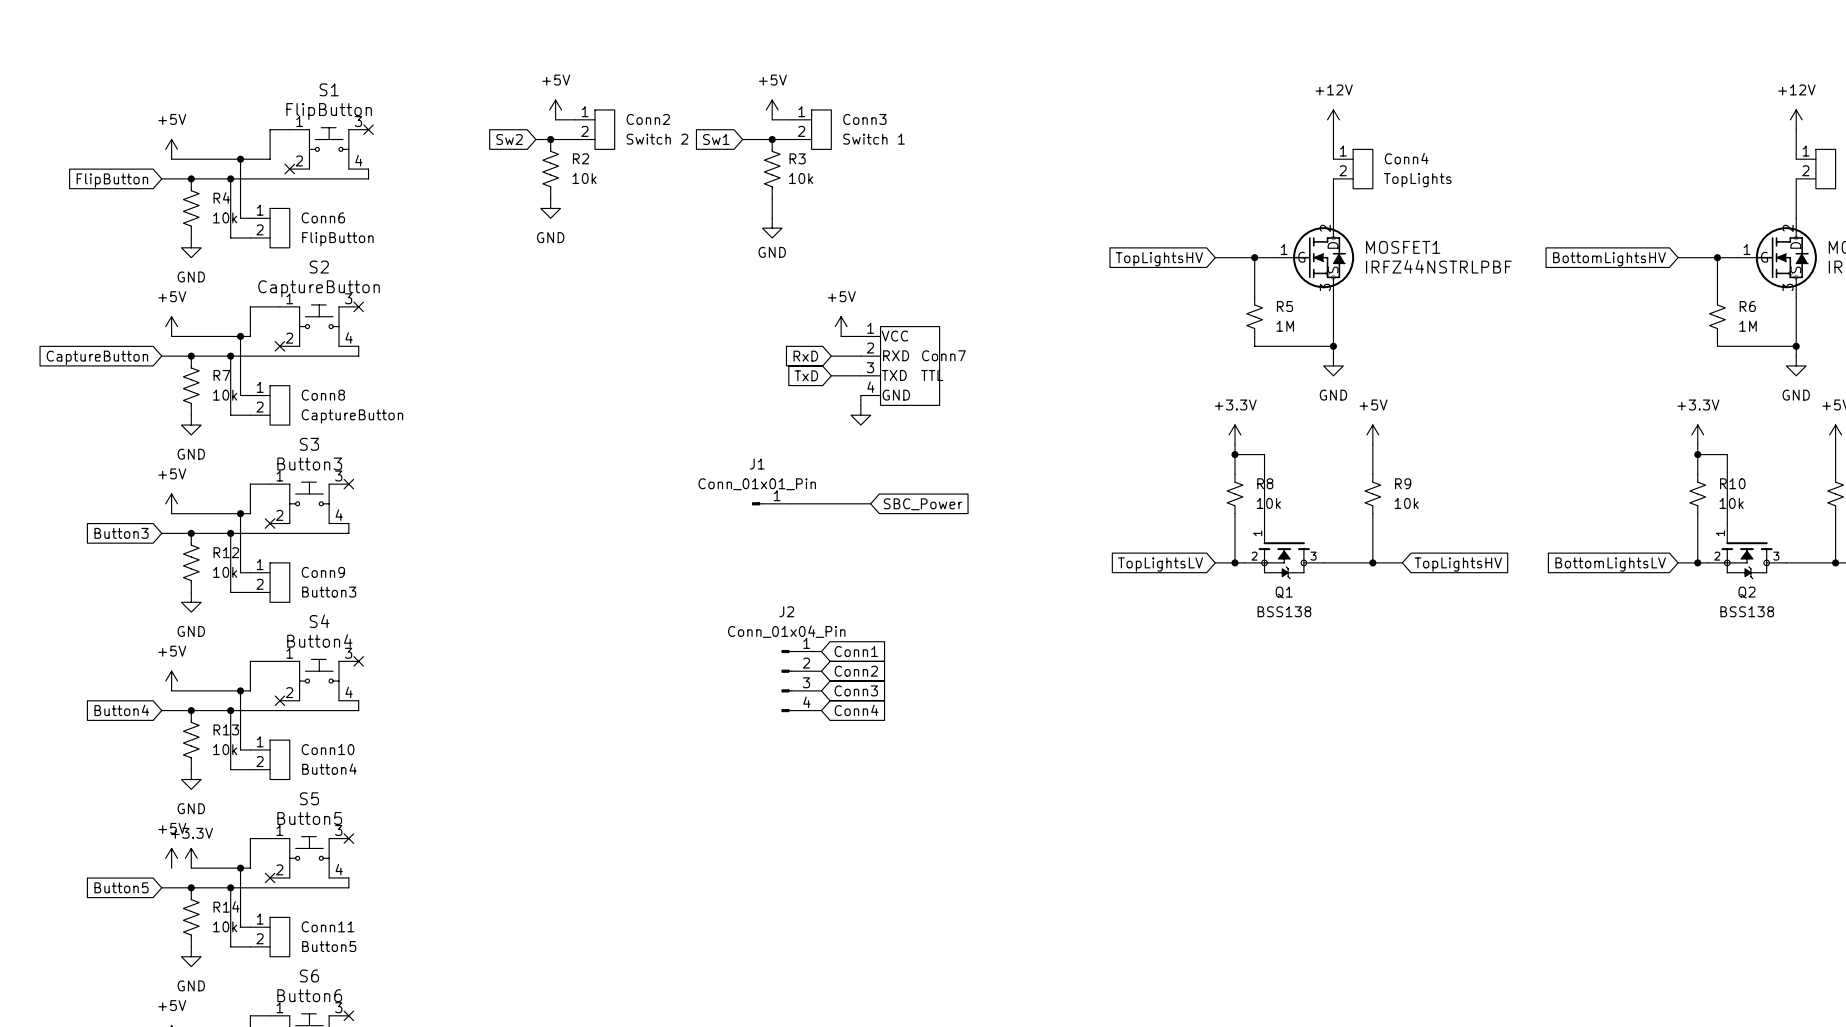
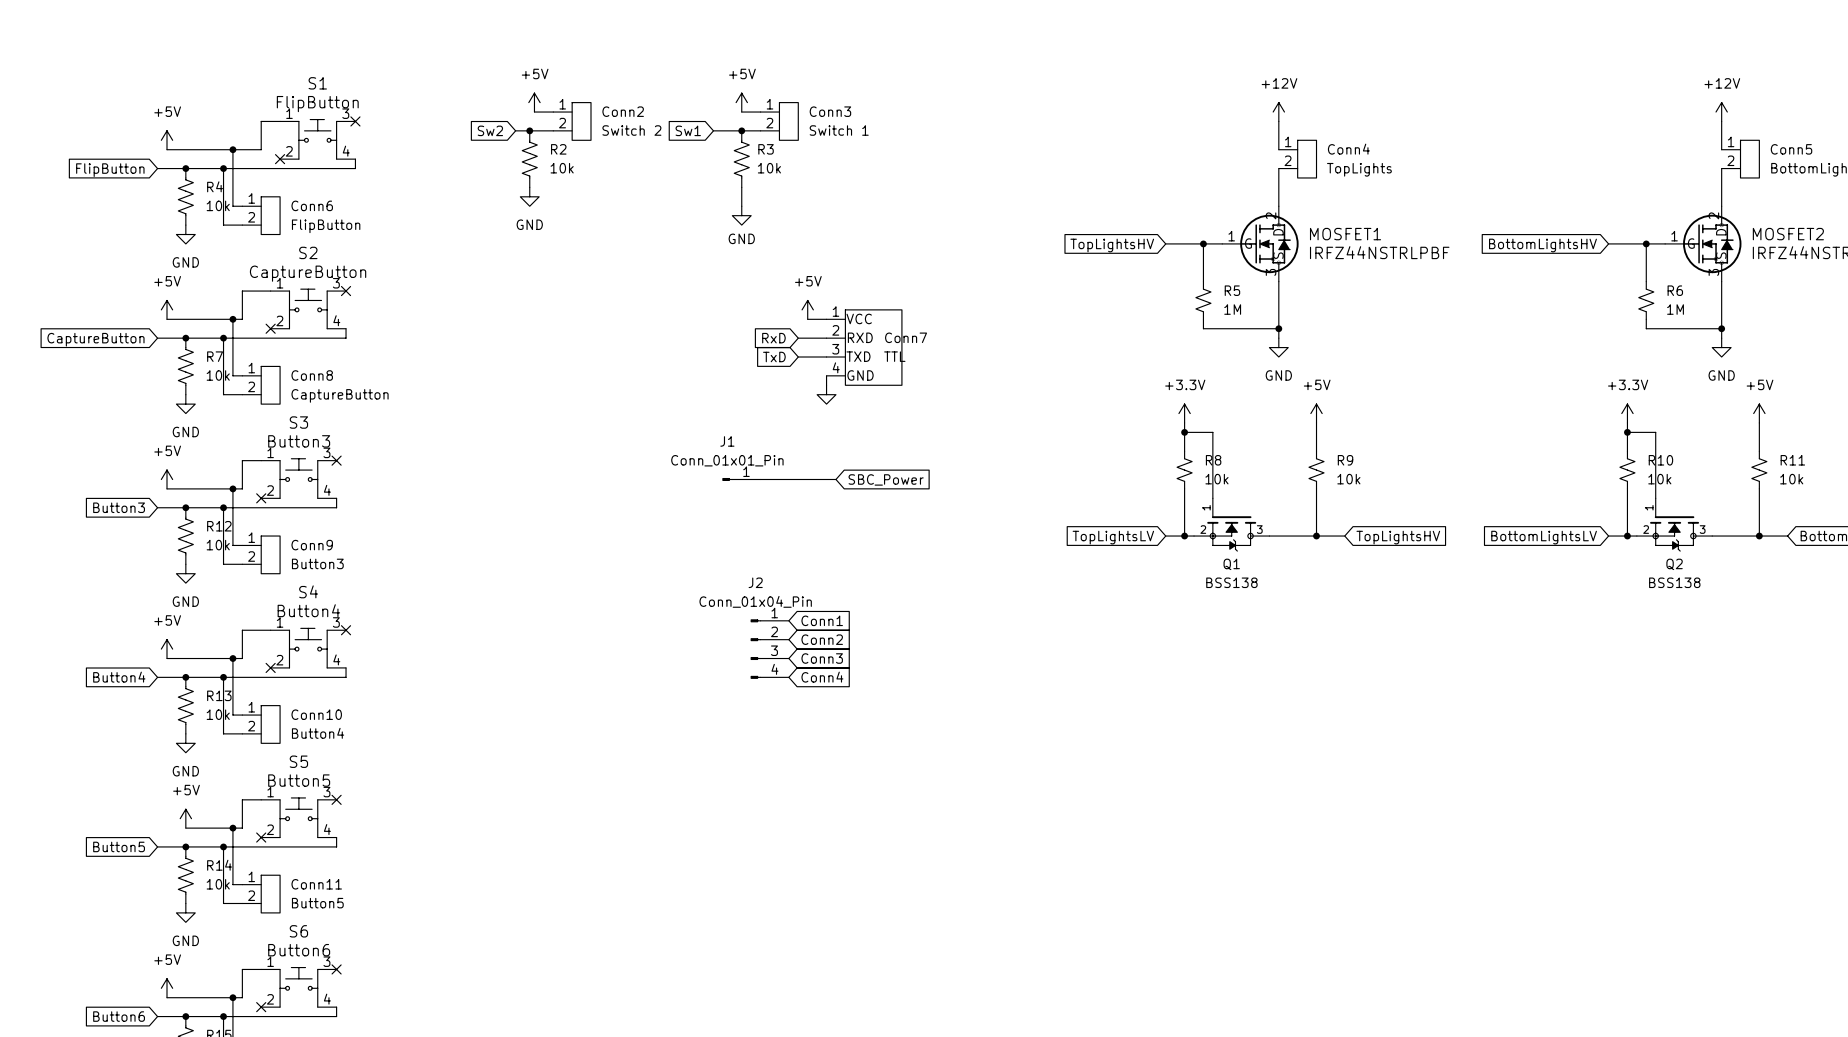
power symbol: +5V (171, 858) -> none
power symbol: +3.3V (191, 858) -> +5V (185, 818)

